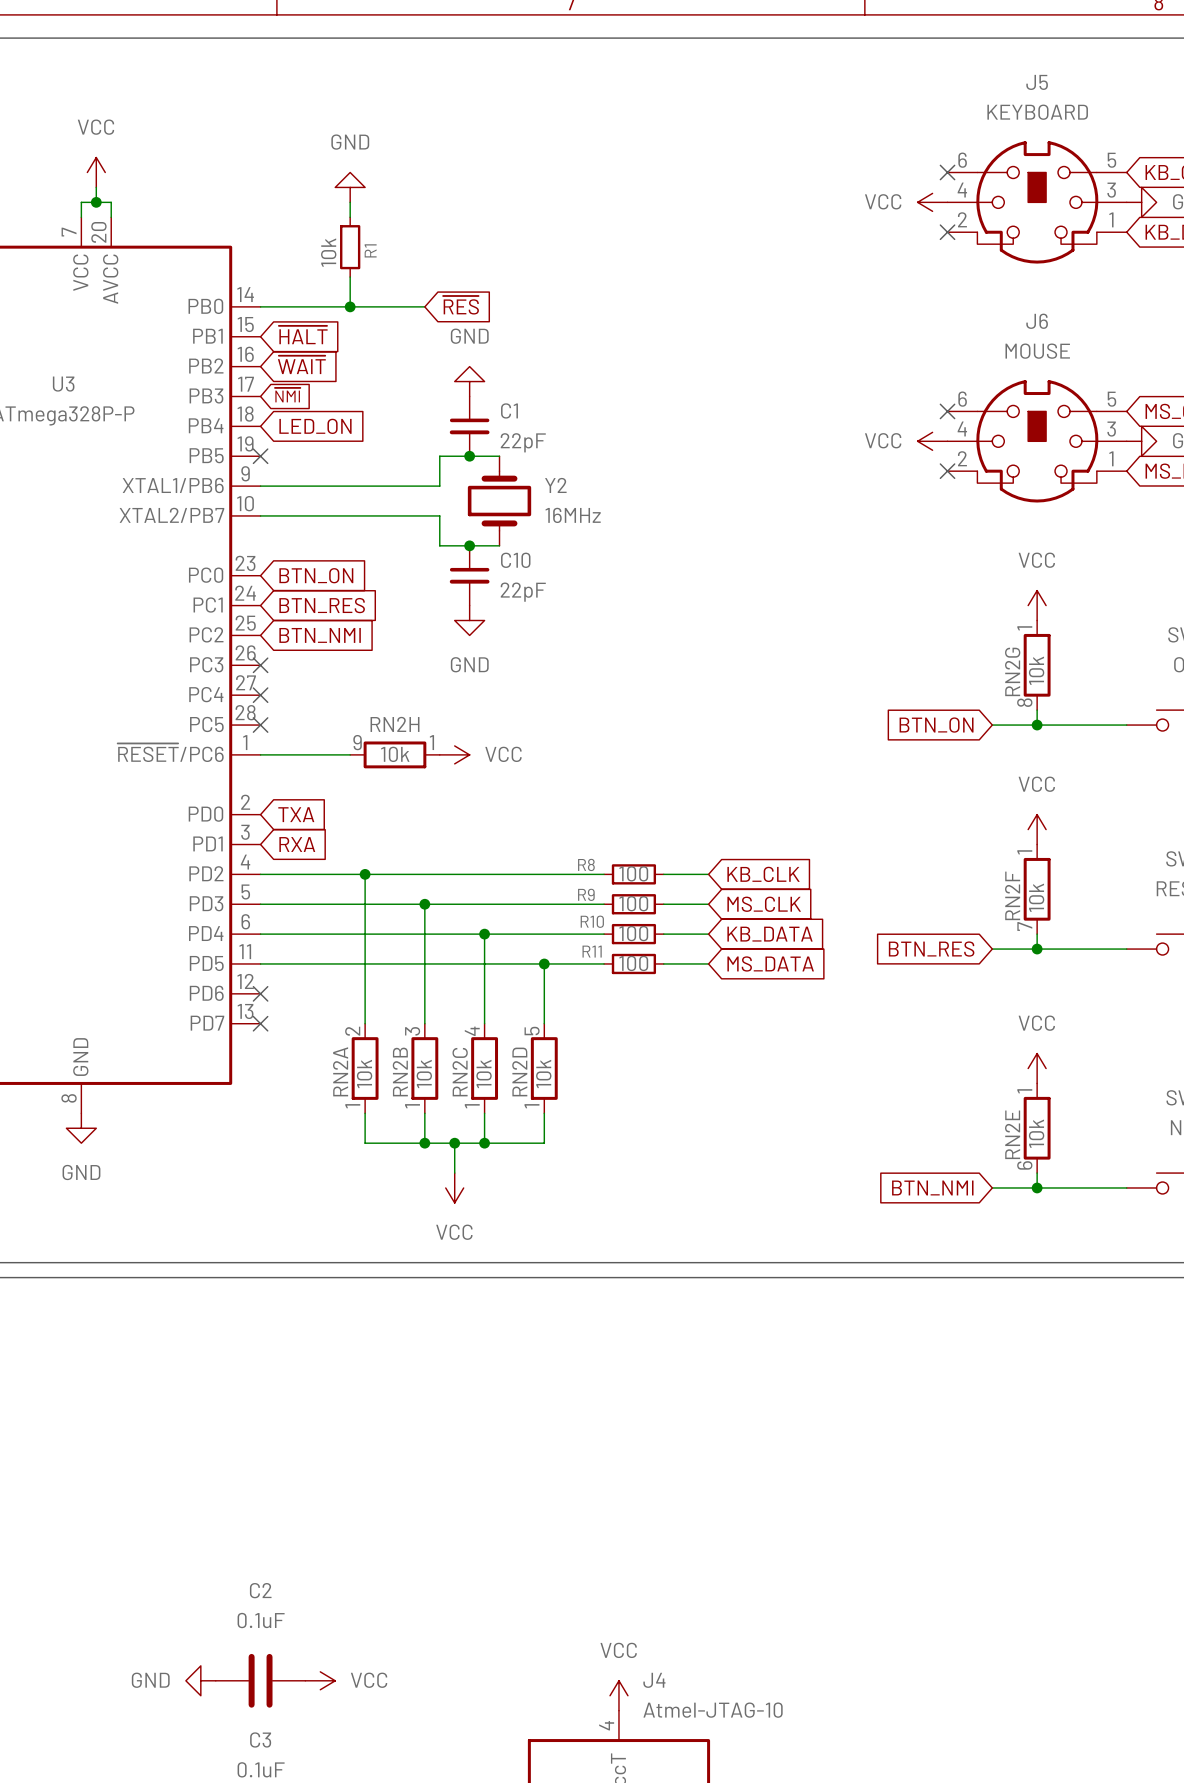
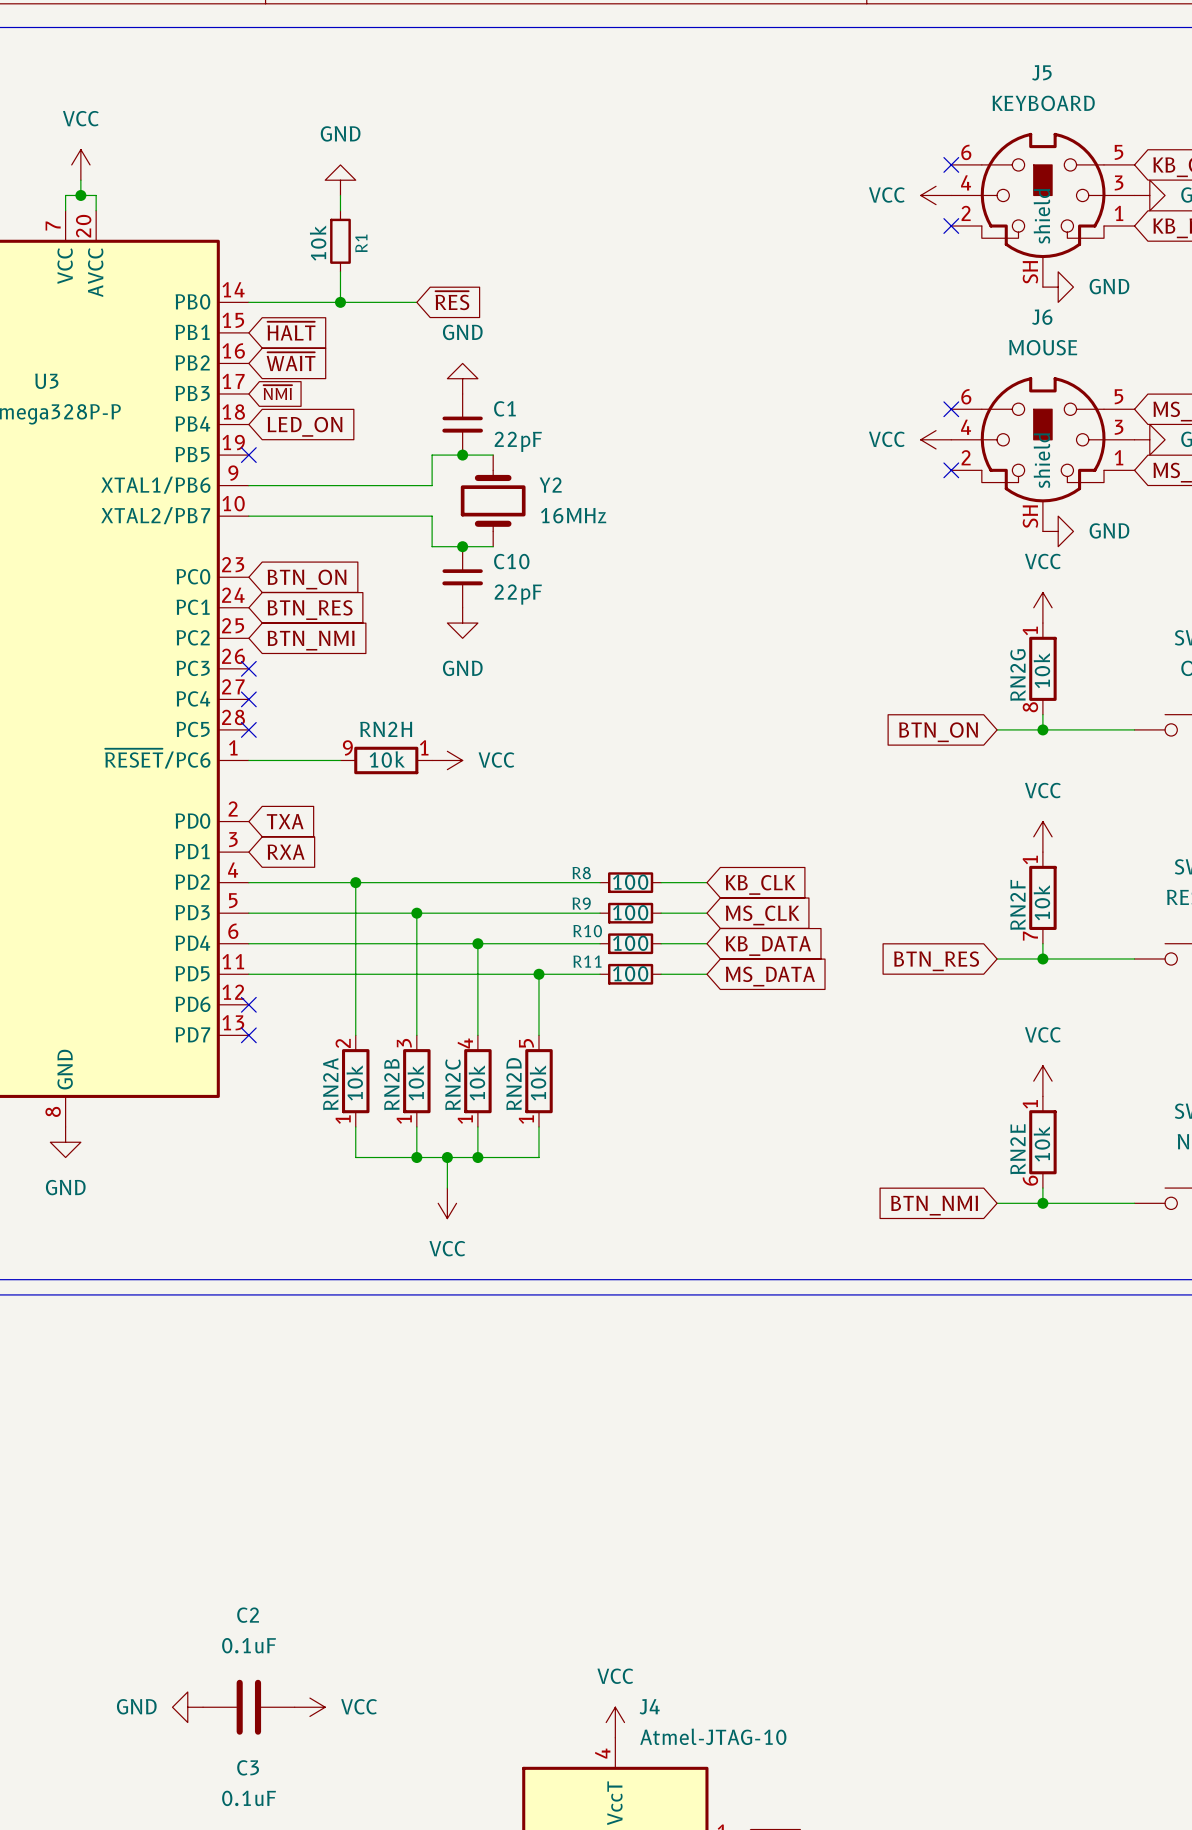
J5 symbol: [947, 141, 1127, 264] -> [951, 132, 1135, 288]
power symbol: none -> GND (1058, 287)
J6 symbol: [947, 380, 1127, 503] -> [951, 377, 1135, 532]
power symbol: none -> GND (1058, 531)

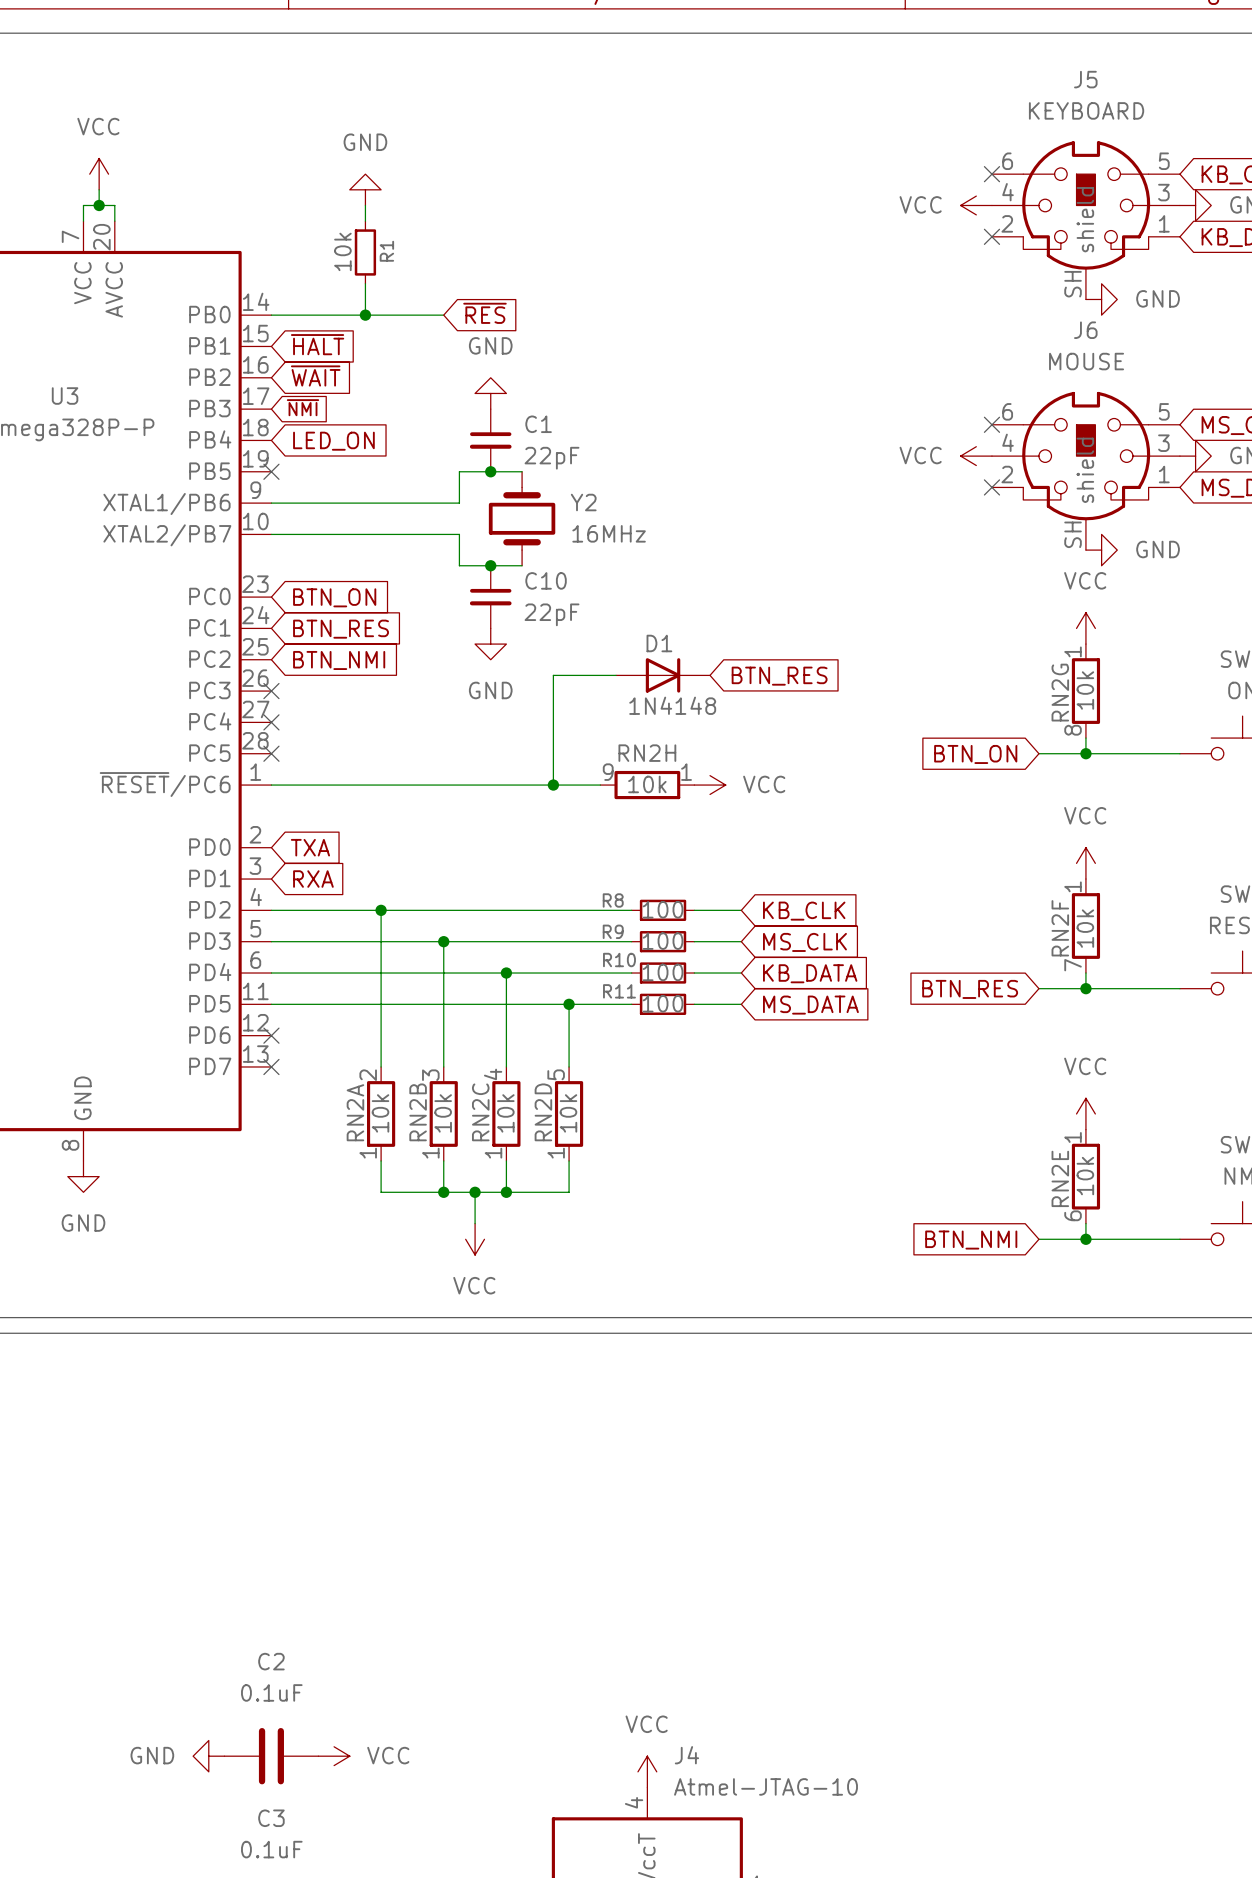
wire: none -> (616, 675) (553, 675) (553, 785)
D1: none -> 1N4148 (663, 675)
global label: none -> BTN_RES (779, 676)
wire: none -> (365, 785) (600, 785)
RN2H position: (386, 760) -> (647, 785)
power symbol position: VCC (447, 760) -> VCC (710, 785)
junction: none -> (553, 785)

